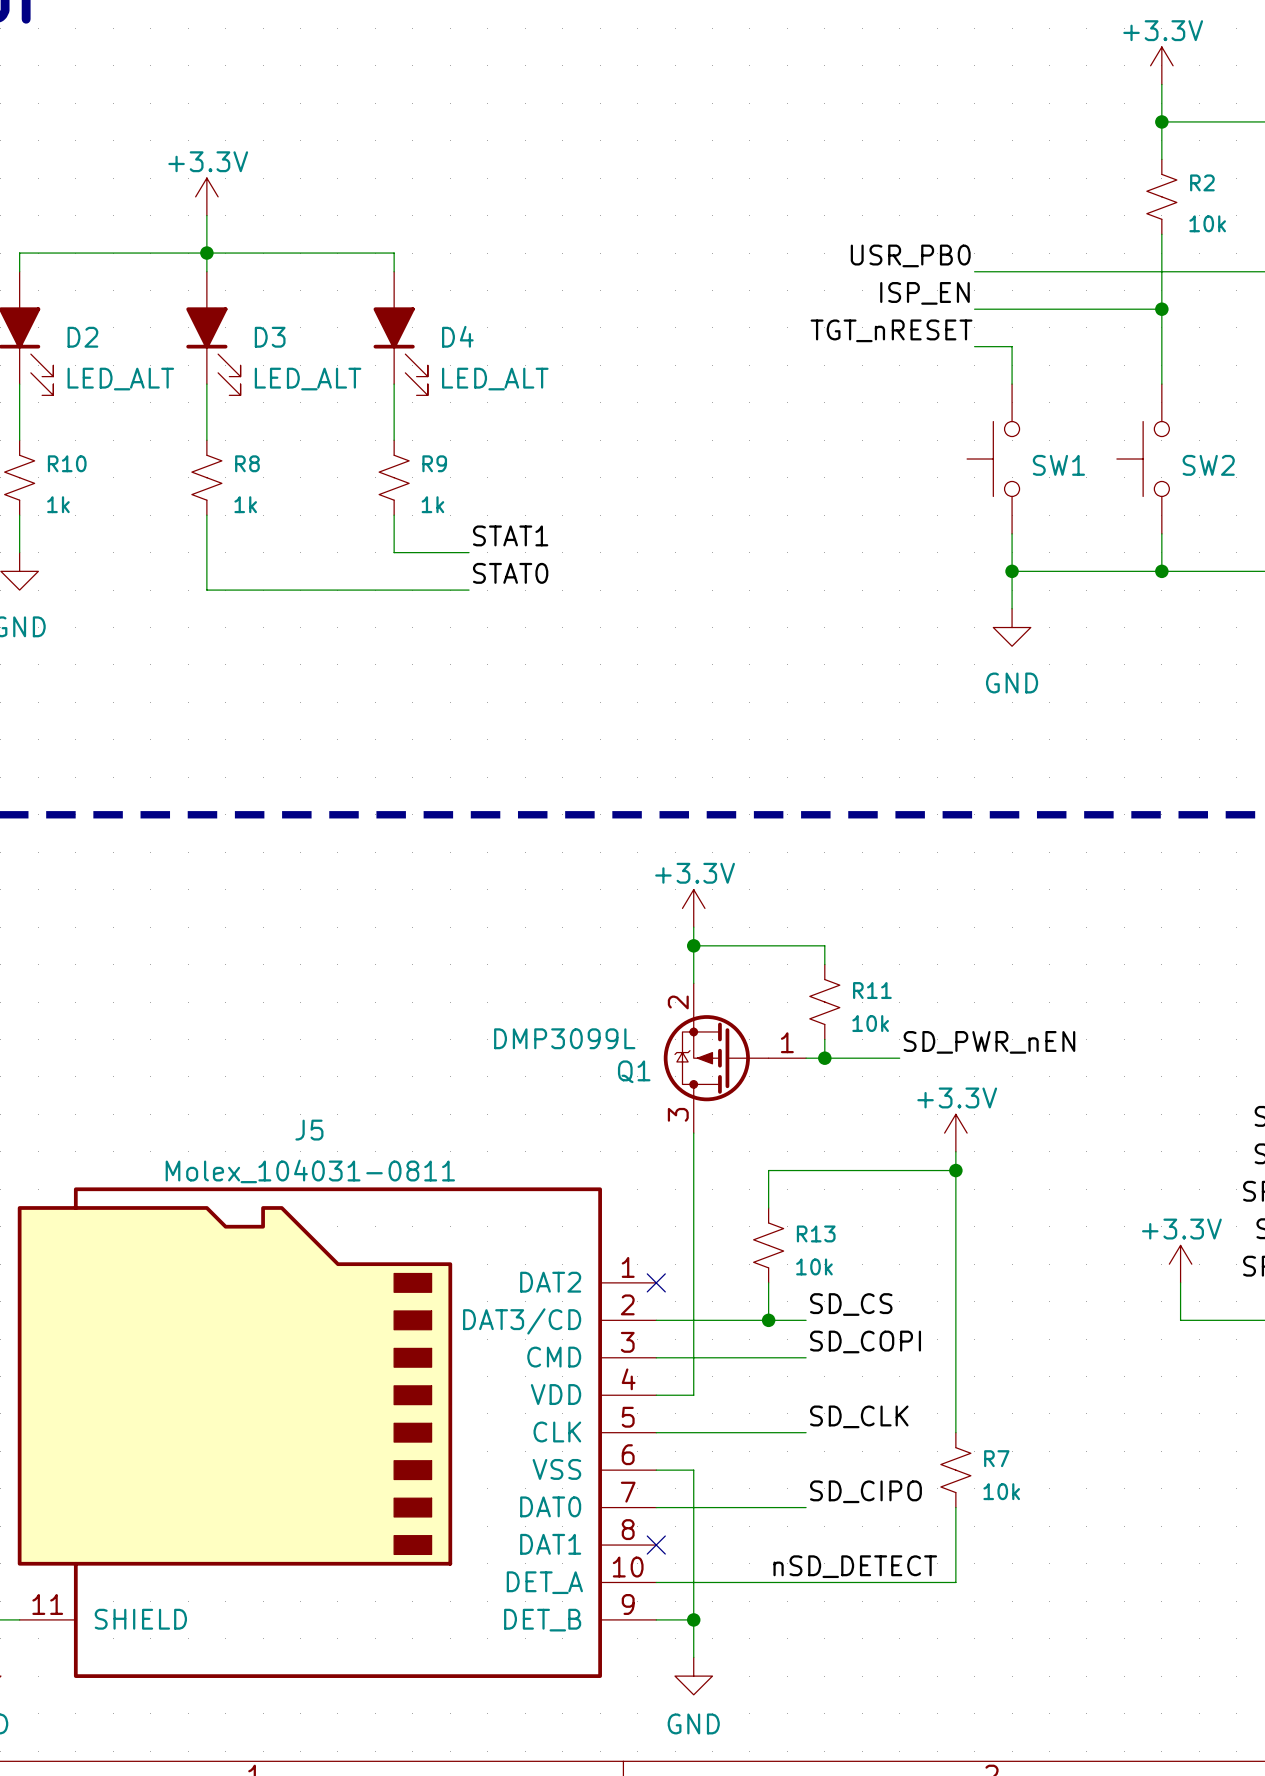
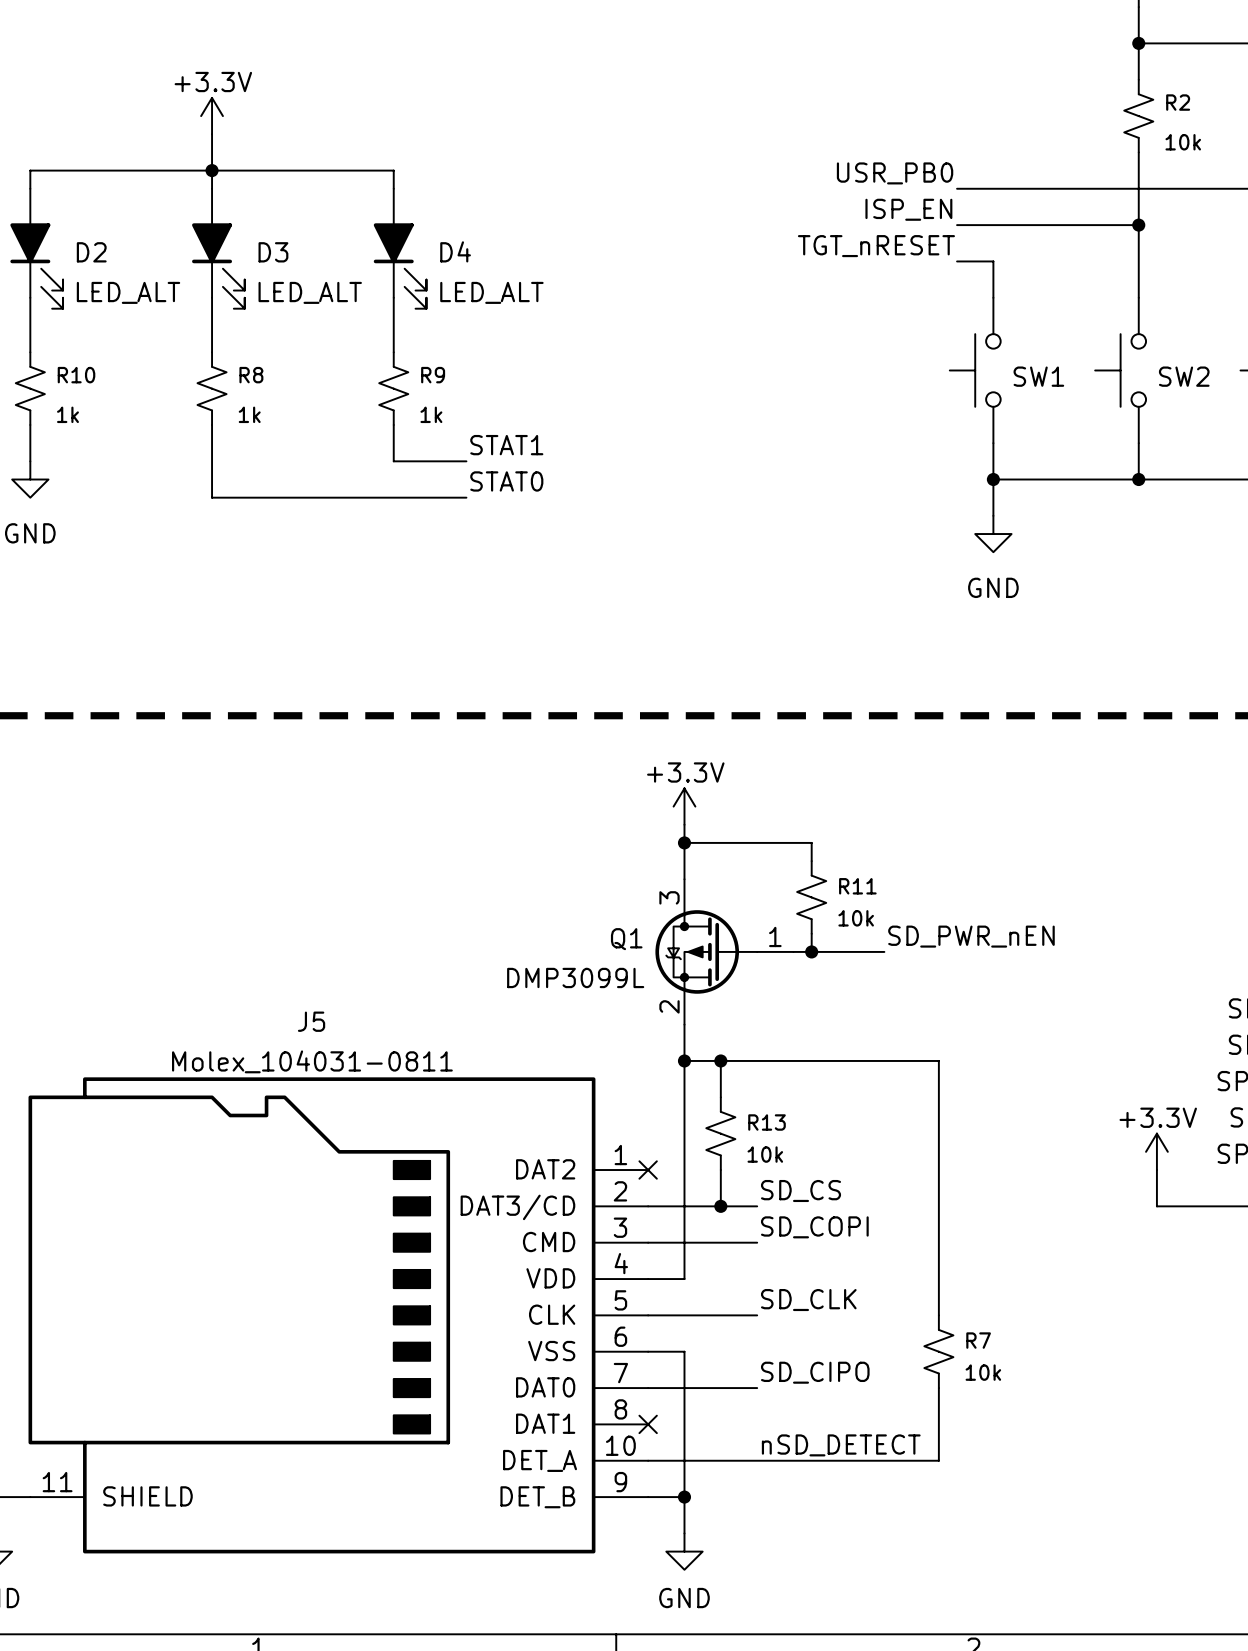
Q1 flip: as is (716, 1058) -> up-down (706, 951)
power symbol: +3.3V (955, 1133) -> none
wire: (955, 1151) (955, 1170) -> none
junction: none -> (684, 1060)
wire: none -> (720, 1060) (720, 1097)
junction: none -> (720, 1060)
wire: (768, 1170) (768, 1207) -> (757, 1060) (684, 1060)
junction: (955, 1170) -> none
R13 position: (768, 1245) -> (720, 1133)
wire: none -> (720, 1170) (720, 1206)
wire: (768, 1282) (768, 1320) (806, 1320) -> none
label position: SD_CS (851, 1304) -> SD_CS (801, 1191)
junction position: (768, 1320) -> (720, 1206)
label position: SD_COPI (865, 1341) -> SD_COPI (814, 1227)
wire: (768, 1357) (806, 1357) -> none
label position: SD_CLK (859, 1416) -> SD_CLK (808, 1300)
wire: (768, 1432) (806, 1432) -> none
label position: SD_CIPO (865, 1491) -> SD_CIPO (815, 1372)
wire: (768, 1507) (806, 1507) -> none

